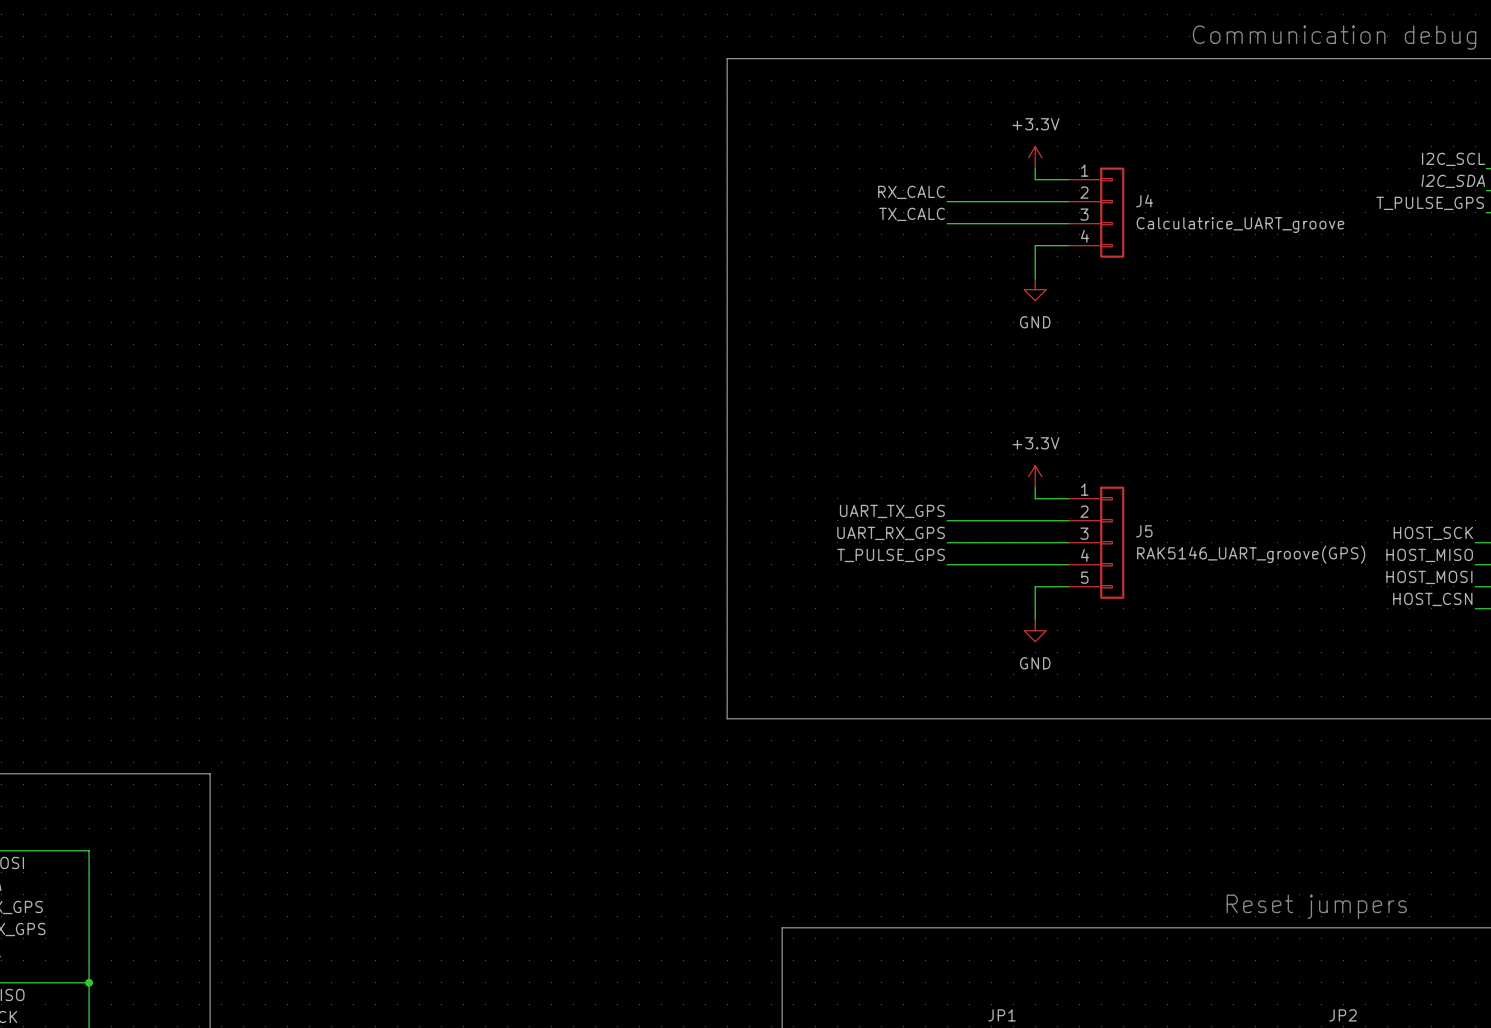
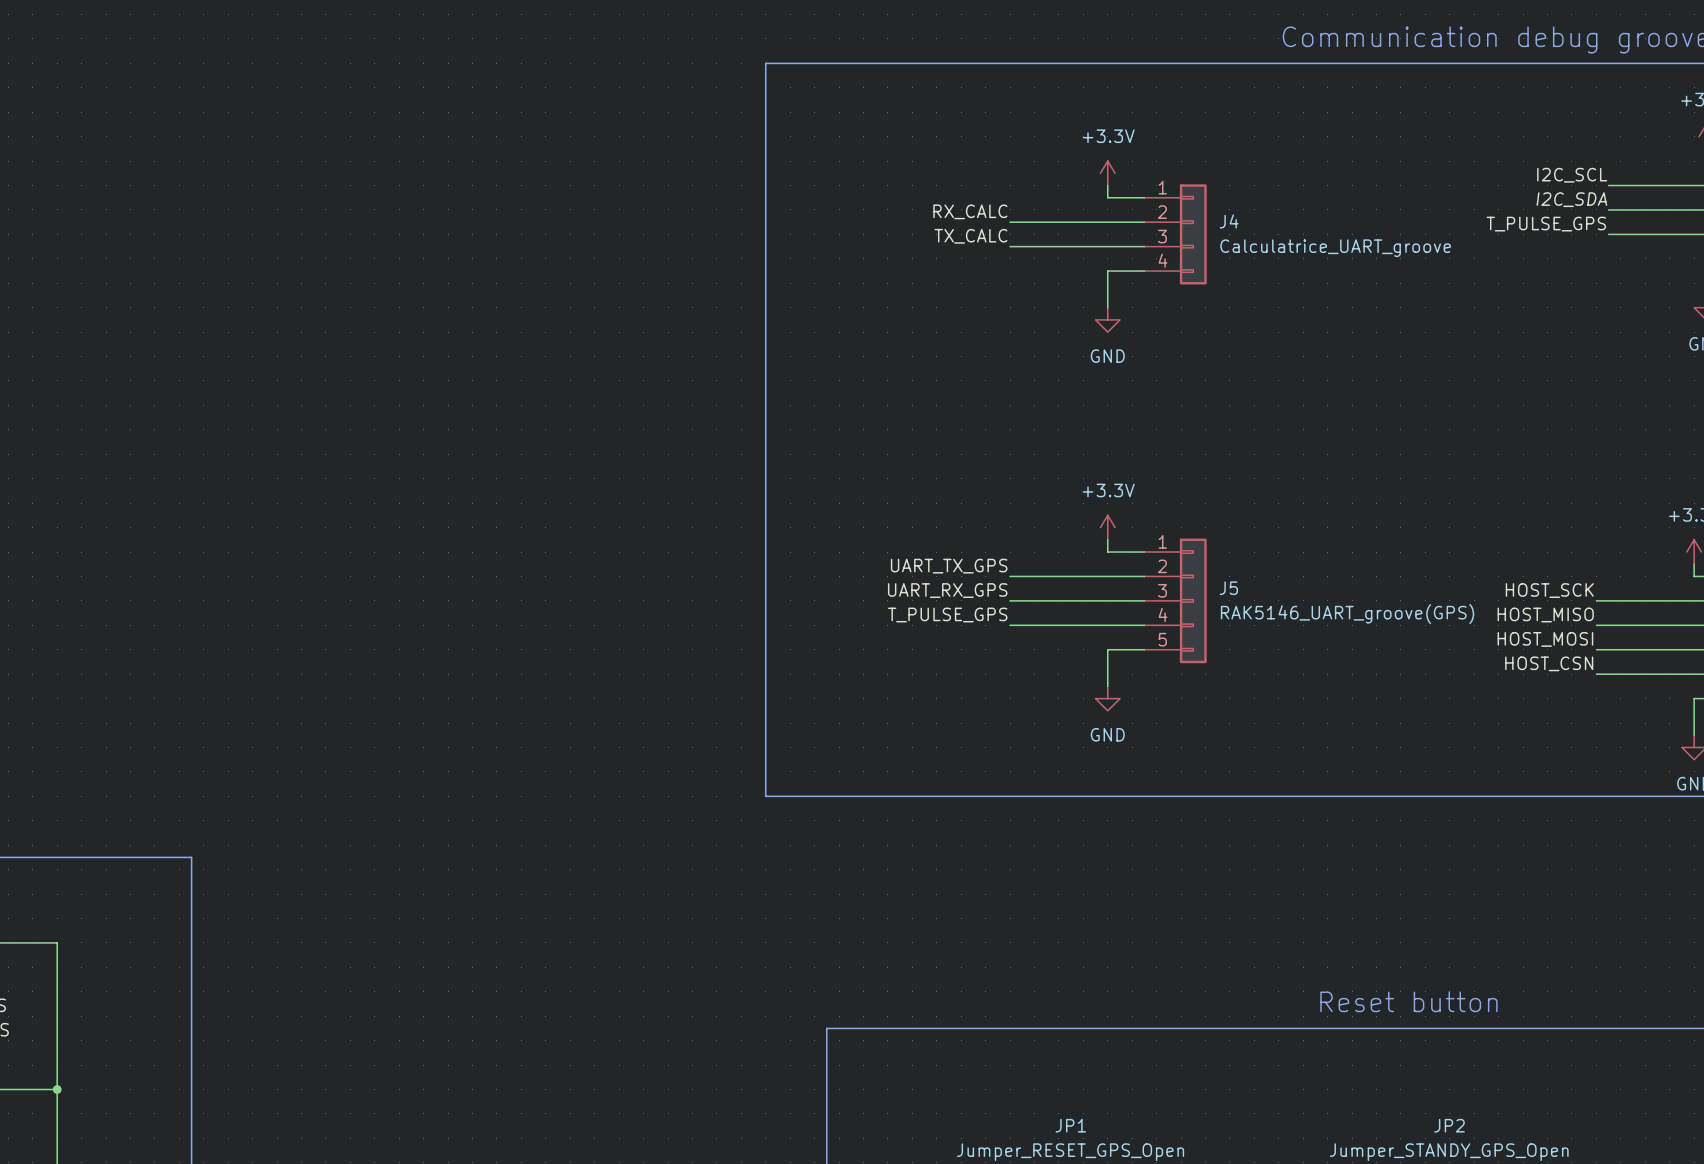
text: Reset jumpers (1316, 906) -> Reset button (1408, 1001)

